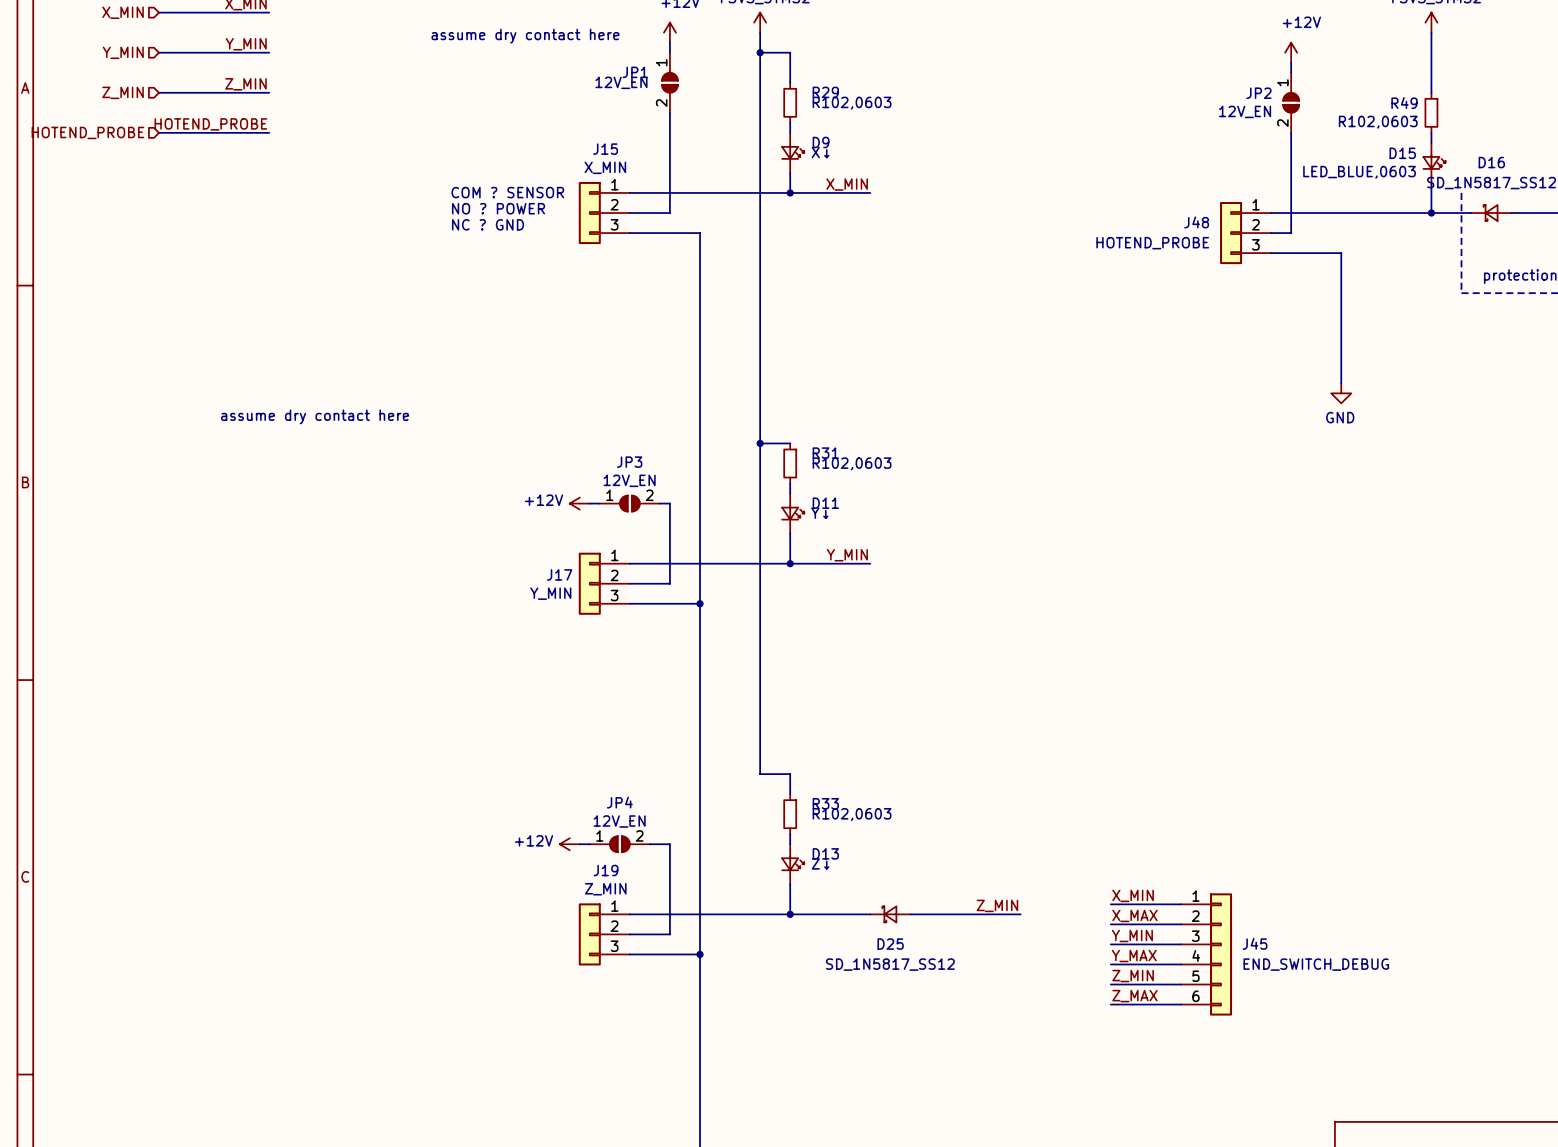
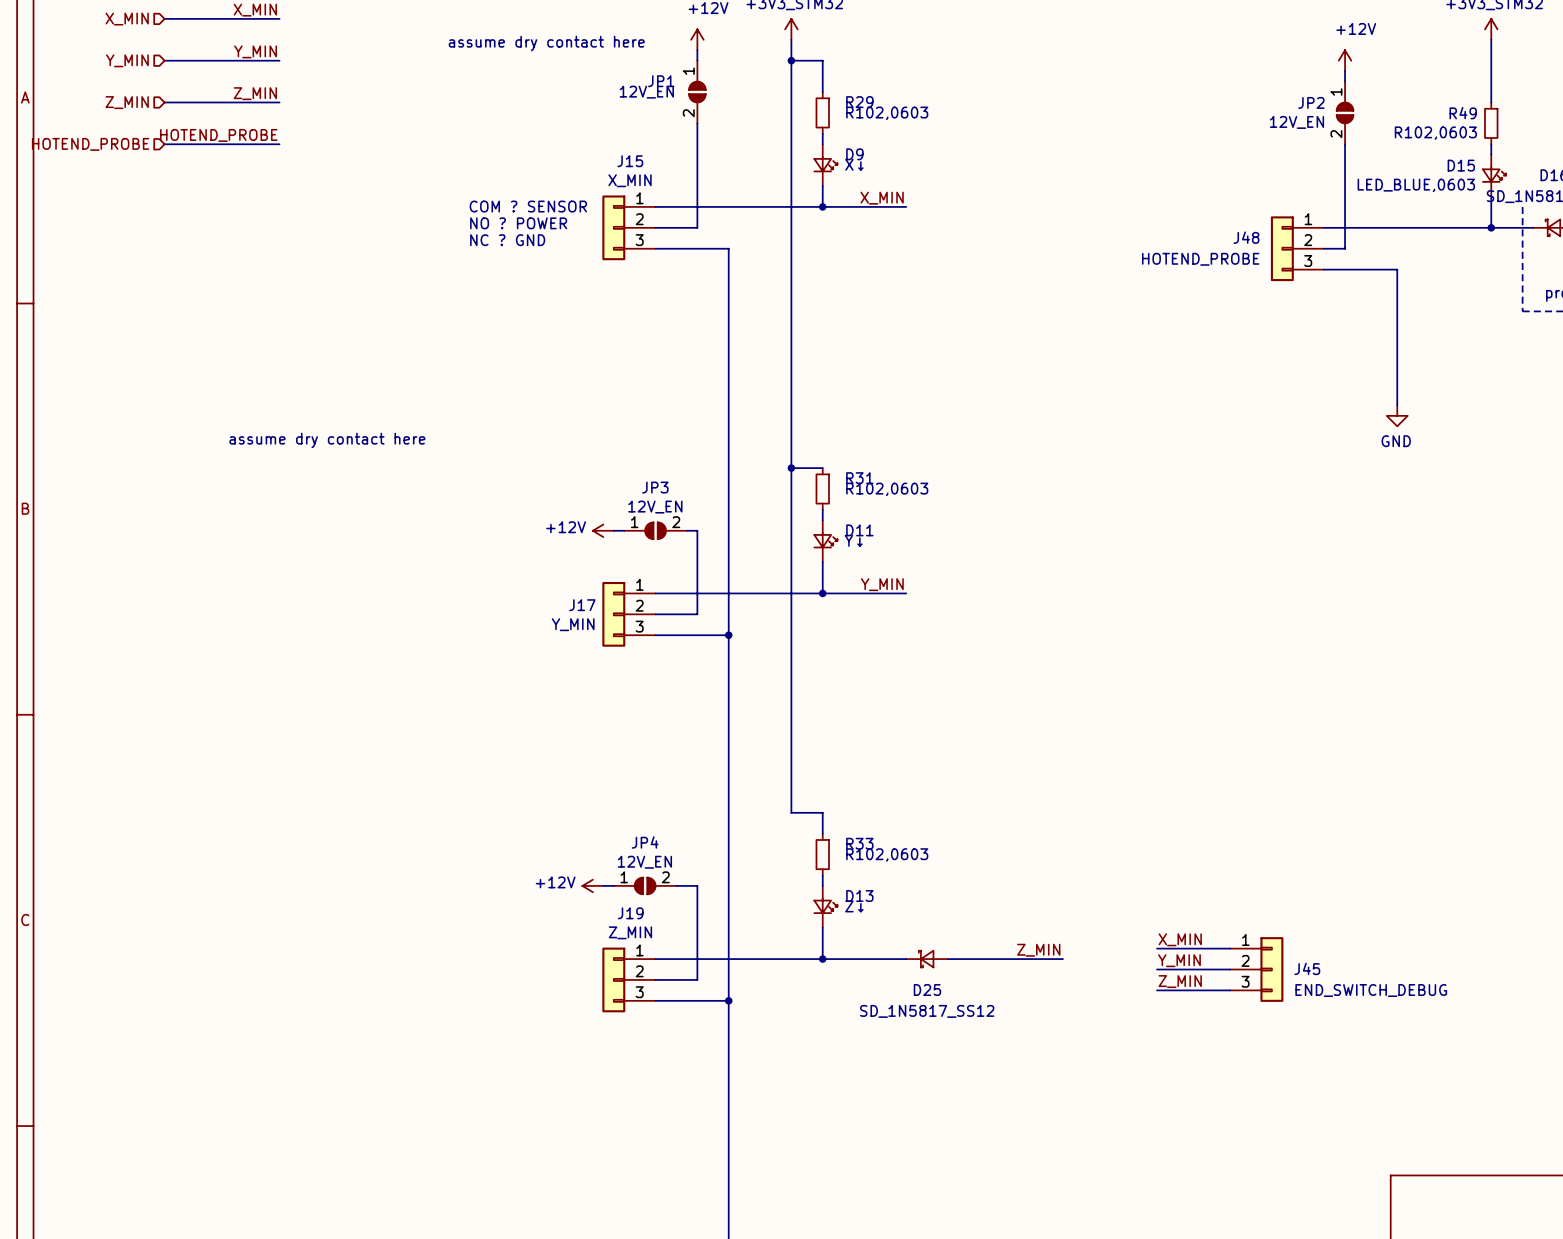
J45 symbol: [1180, 893, 1233, 1016] -> [1230, 937, 1284, 1002]
label: X_MAX (1134, 915) -> Y_MIN (1179, 960)
label: Y_MIN (1132, 935) -> Z_MIN (1180, 981)
label: Y_MAX (1134, 956) -> none
wire: (1110, 964) (1180, 964) -> none
label: Z_MIN (1133, 976) -> none
wire: (1110, 984) (1180, 984) -> none
label: Z_MAX (1134, 996) -> none
wire: (1110, 1004) (1180, 1004) -> none

